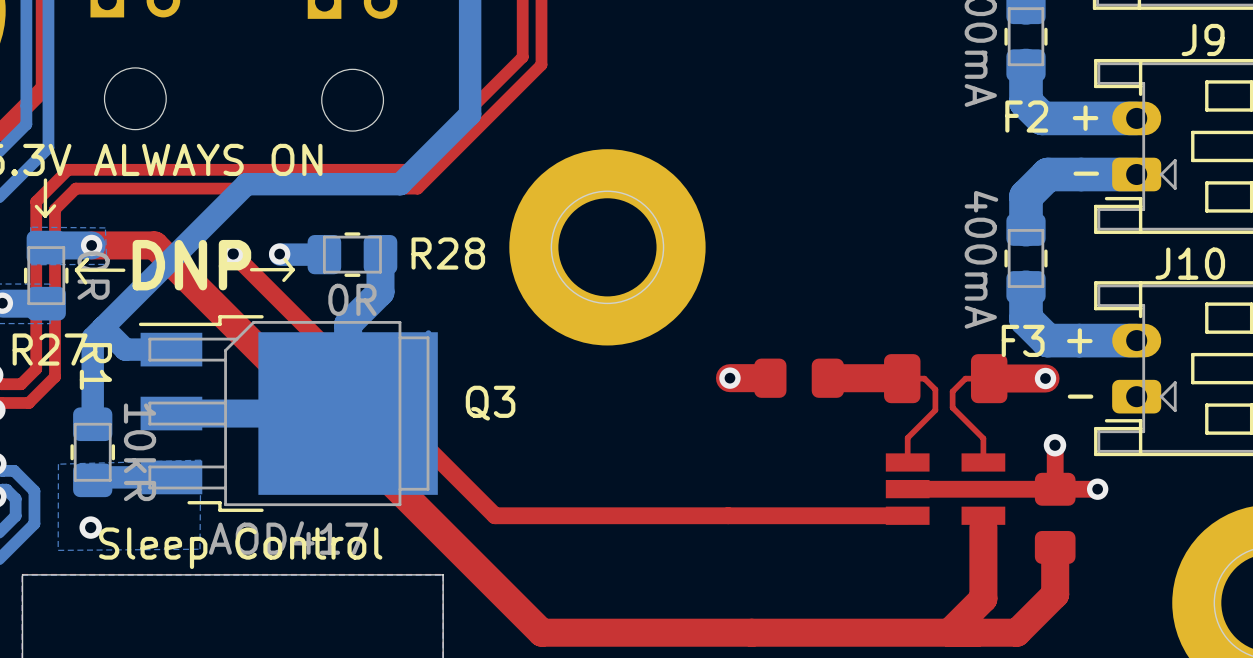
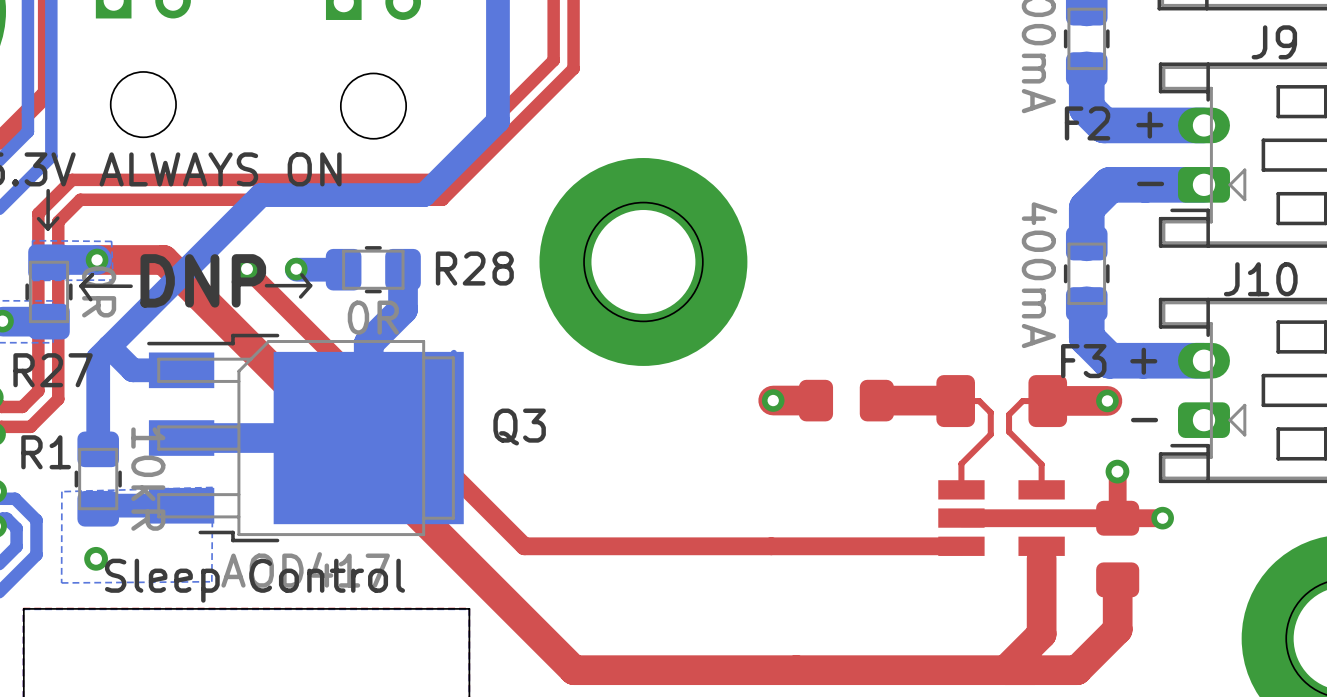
R1 name rotation: 0° (95, 366) -> 90° counterclockwise (46, 452)
R1 name position: R1 (95, 366) -> R1 (46, 452)

